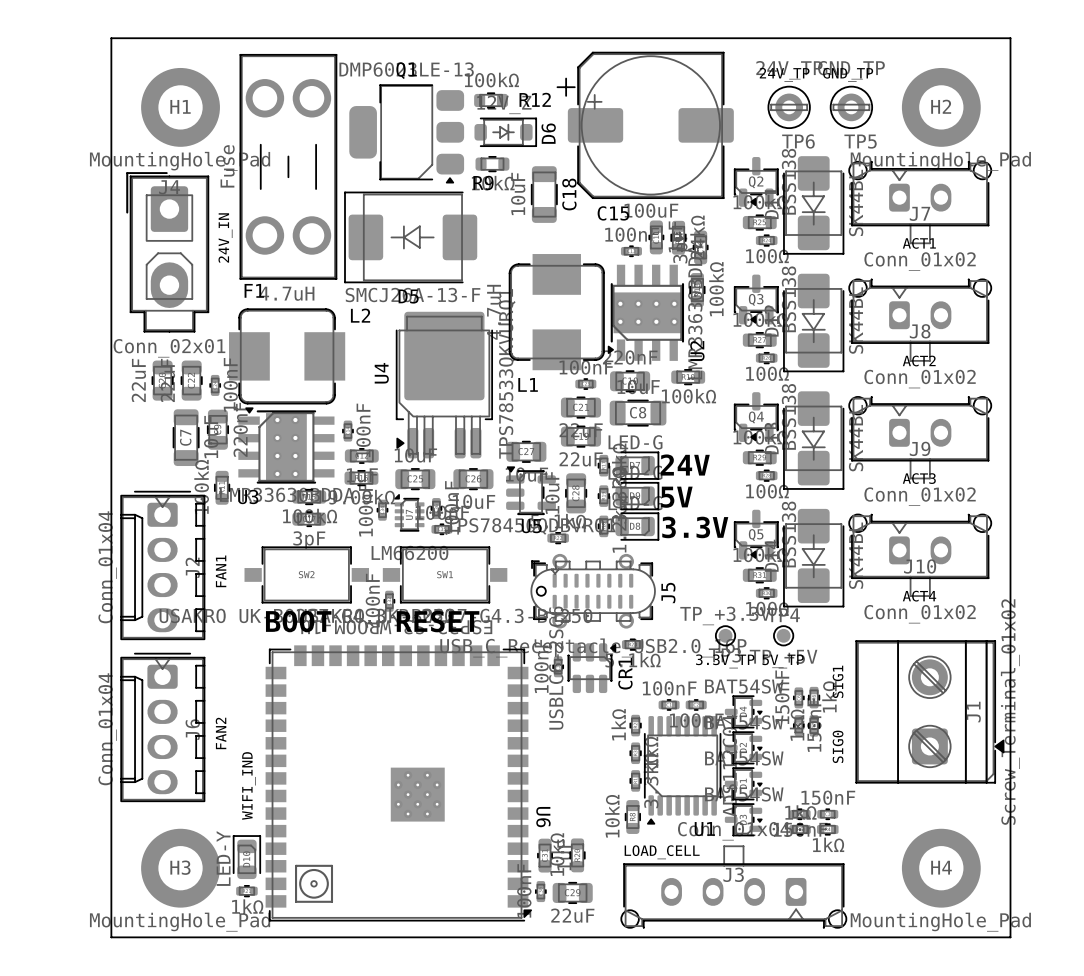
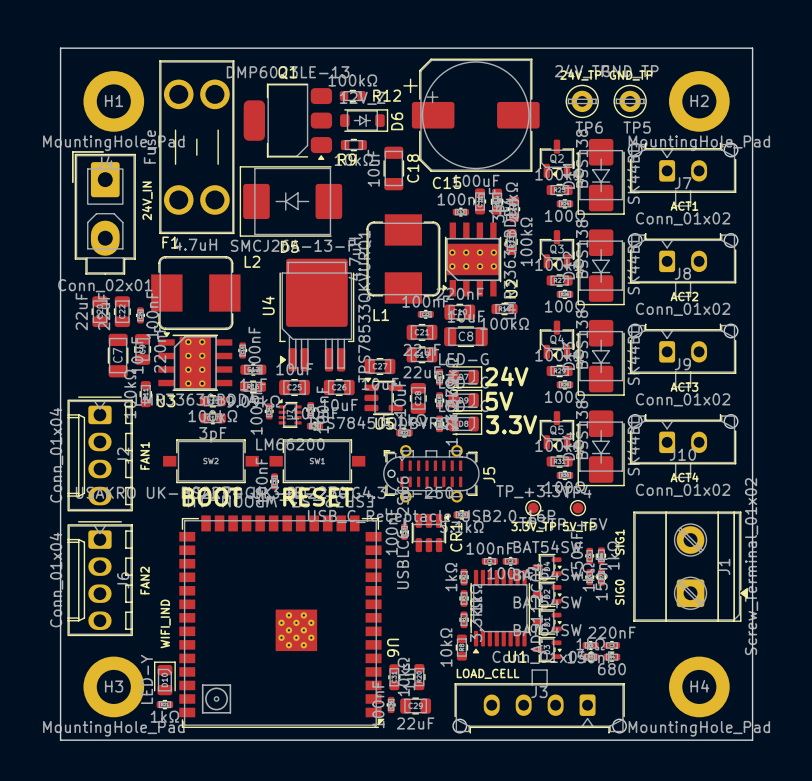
part value: 150nF (828, 797) -> 220nF (611, 632)
part value: 1kΩ (828, 844) -> 680 (611, 669)

